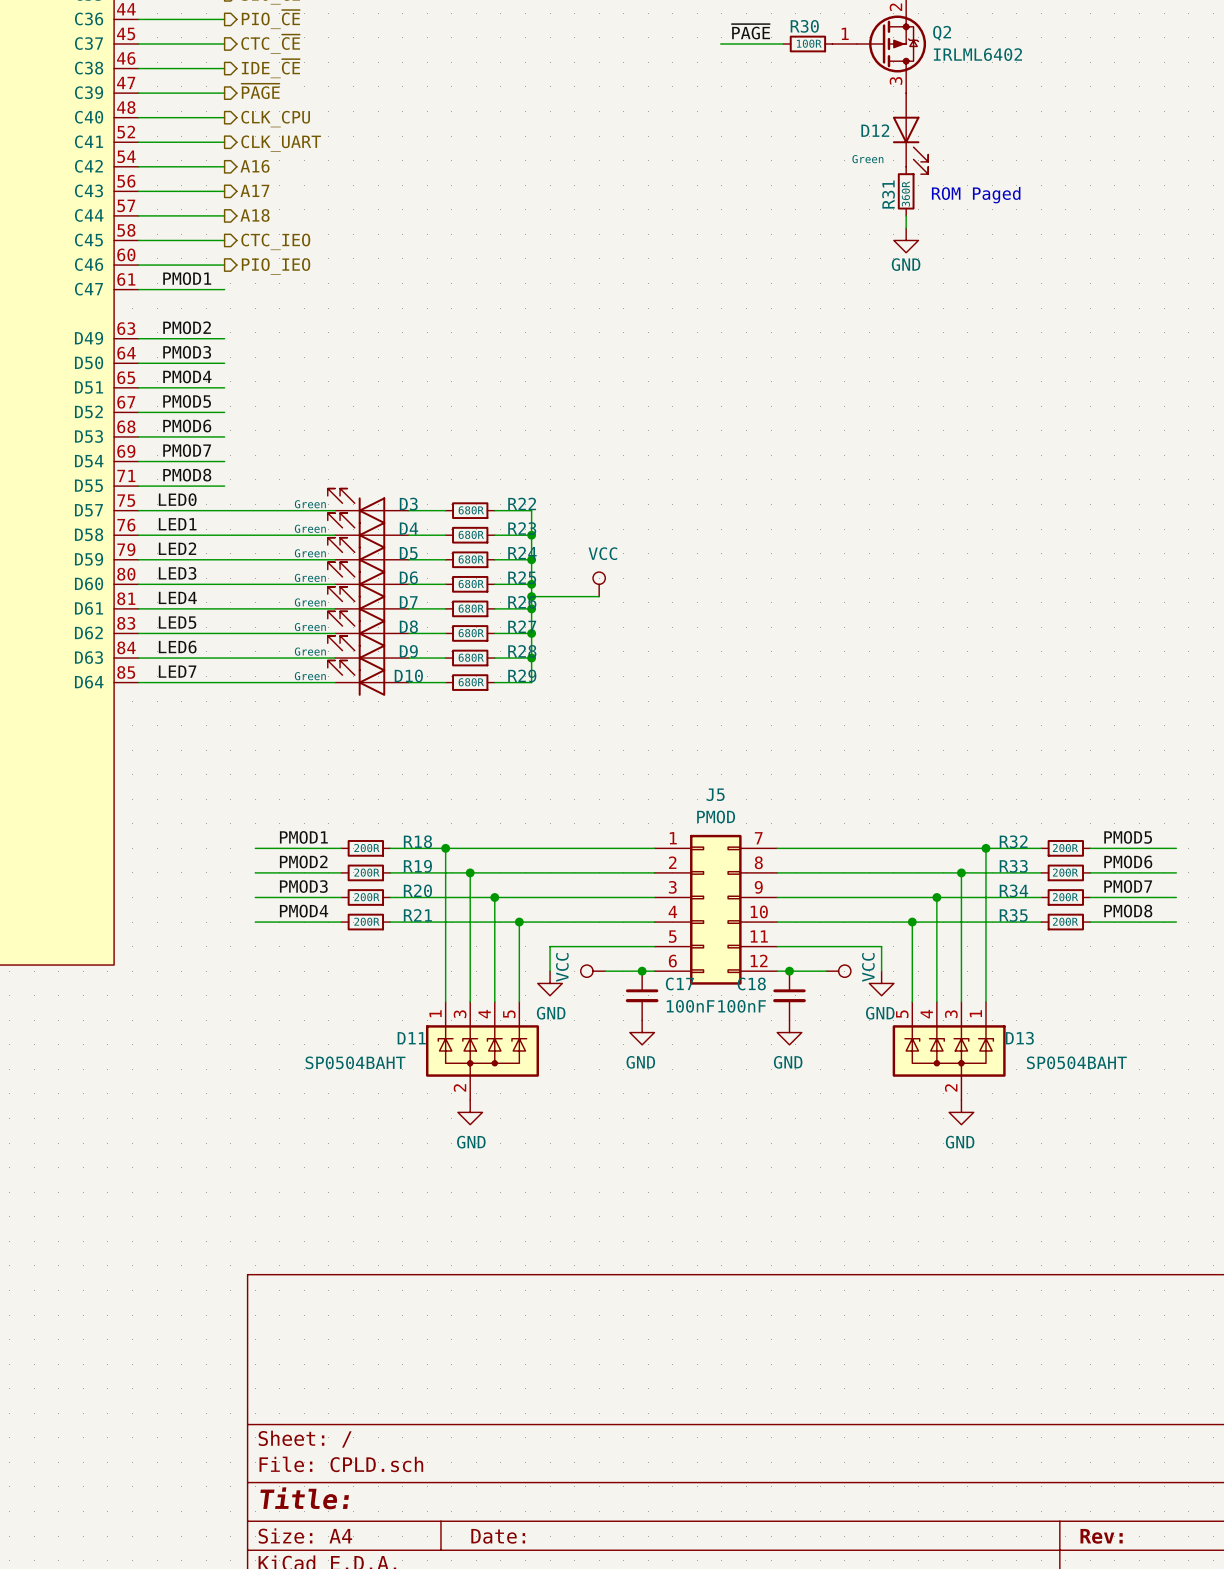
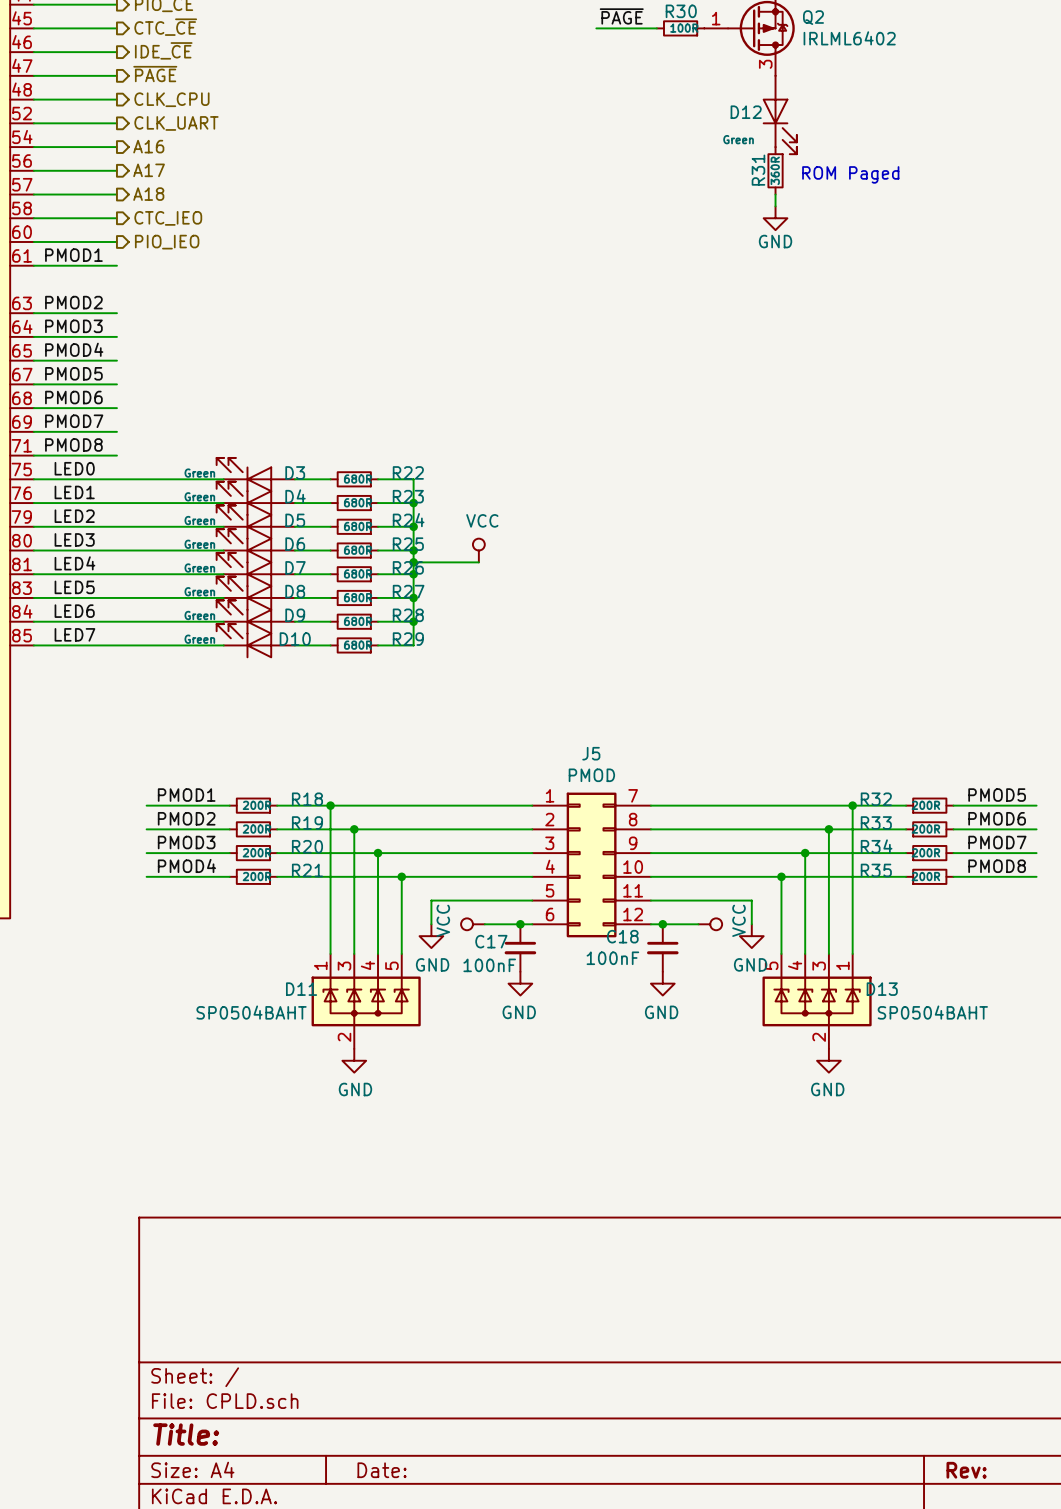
C17 name position: C17 (679, 983) -> C17 (491, 941)
C17 value position: 100nF (690, 1006) -> 100nF (489, 965)

